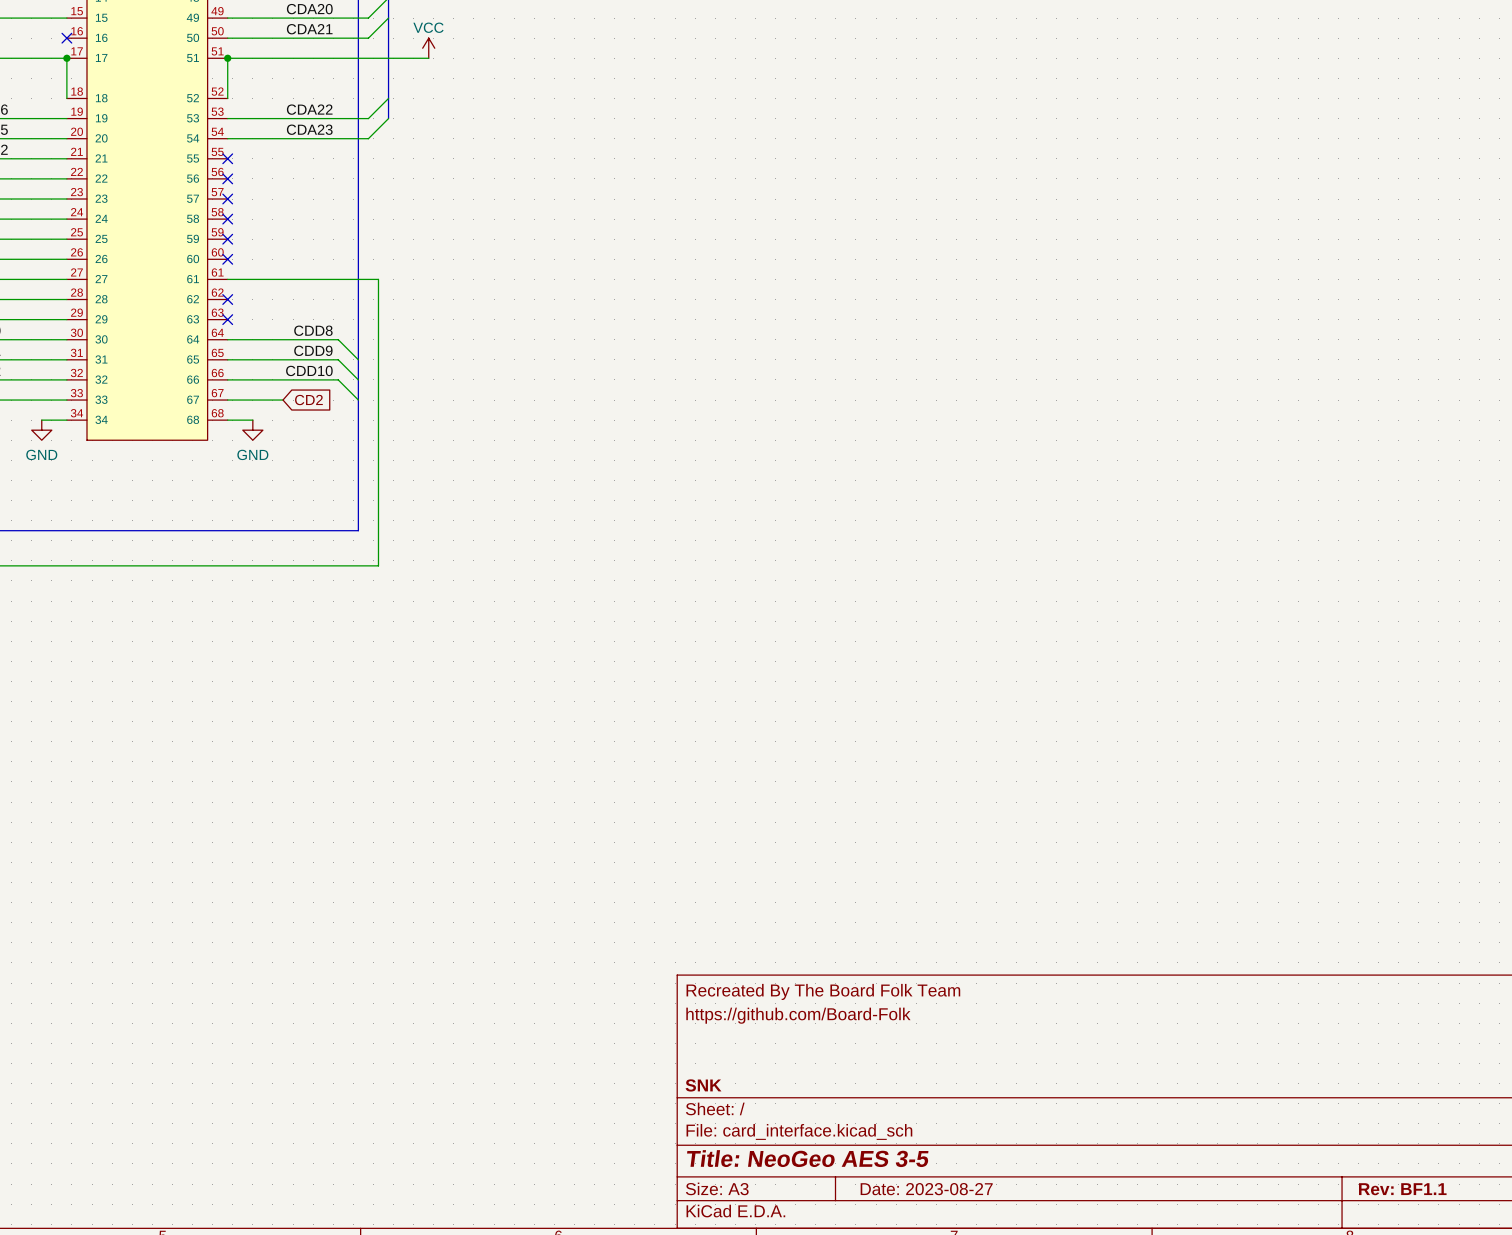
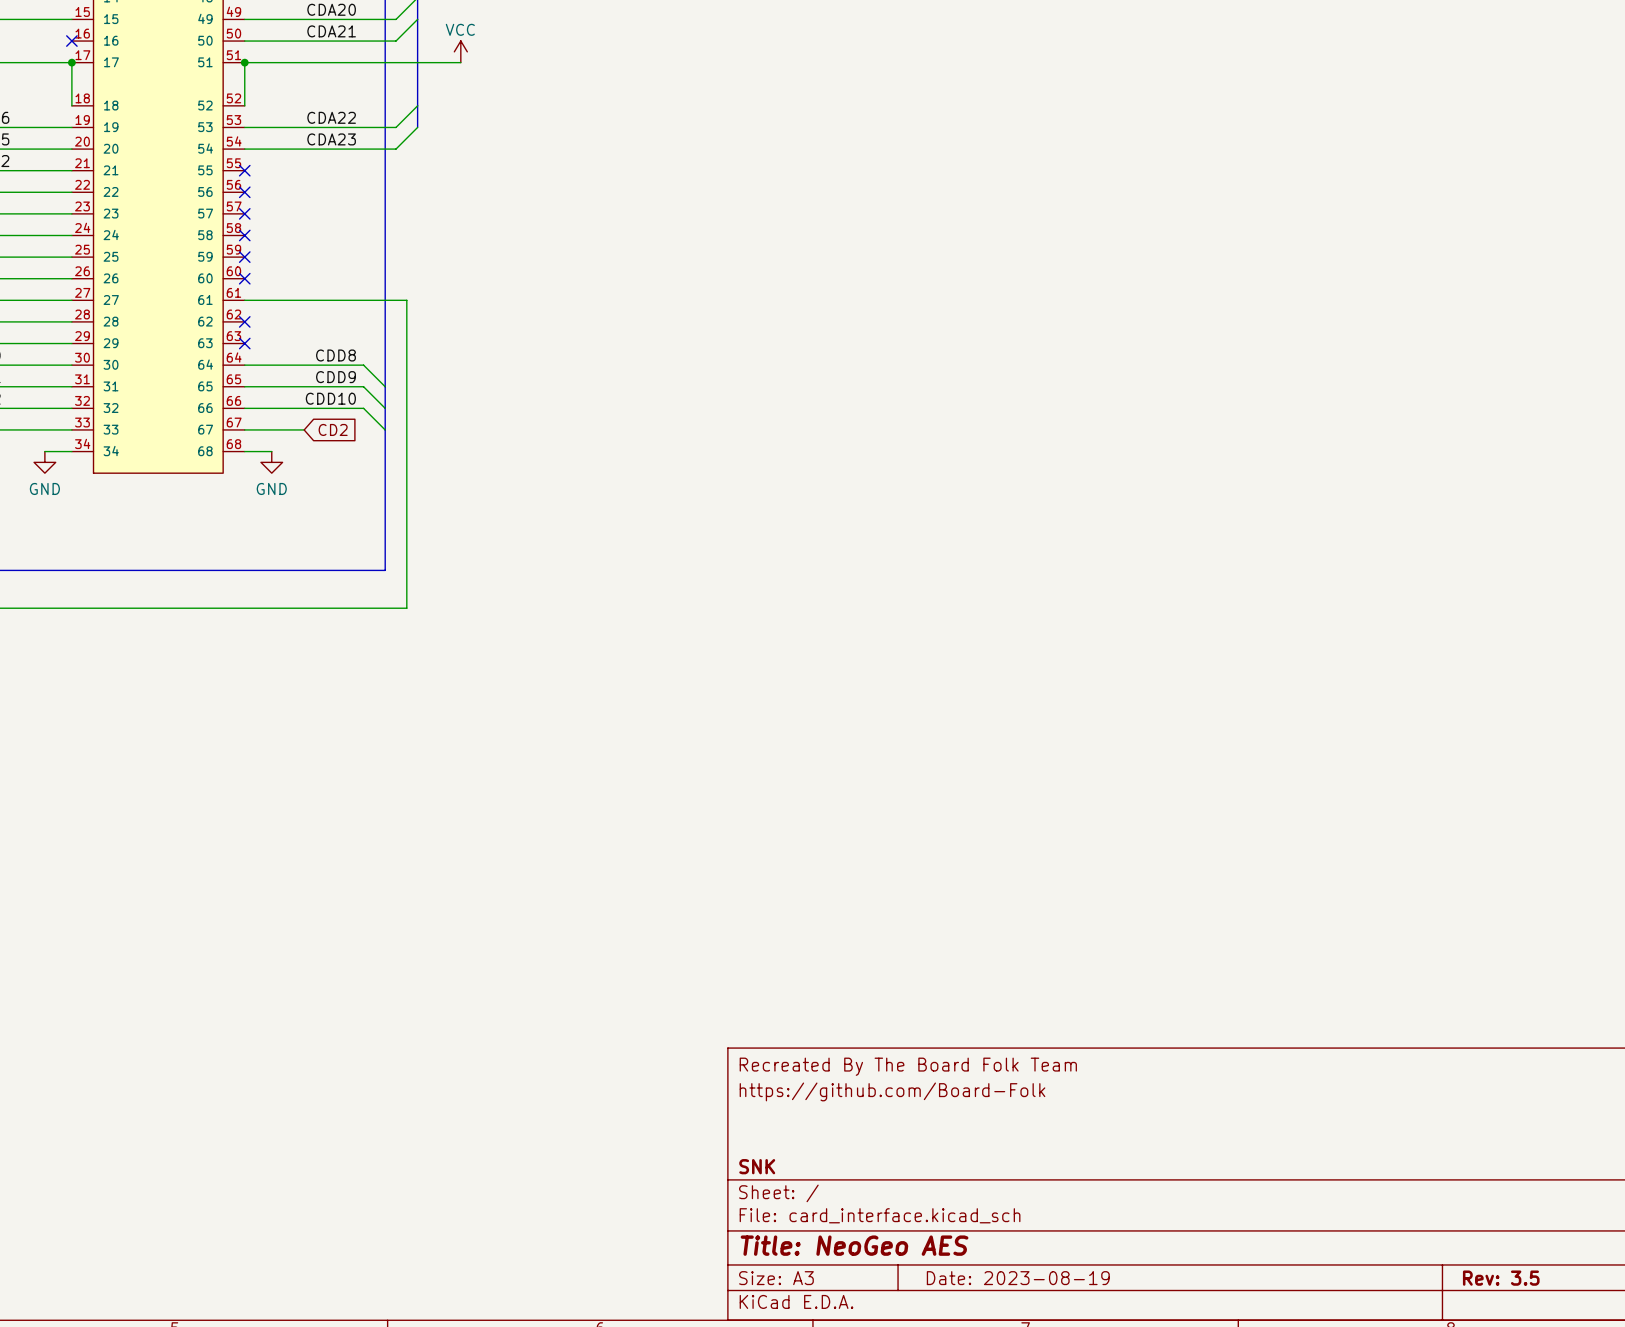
title block: Title: NeoGeo AES 3-5 (807, 1158) -> Title: NeoGeo AES (854, 1245)
title block: Date: 2023-08-27 (926, 1189) -> Date: 2023-08-19 (1018, 1278)
title block: Rev: BF1.1 (1402, 1189) -> Rev: 3.5 (1501, 1278)

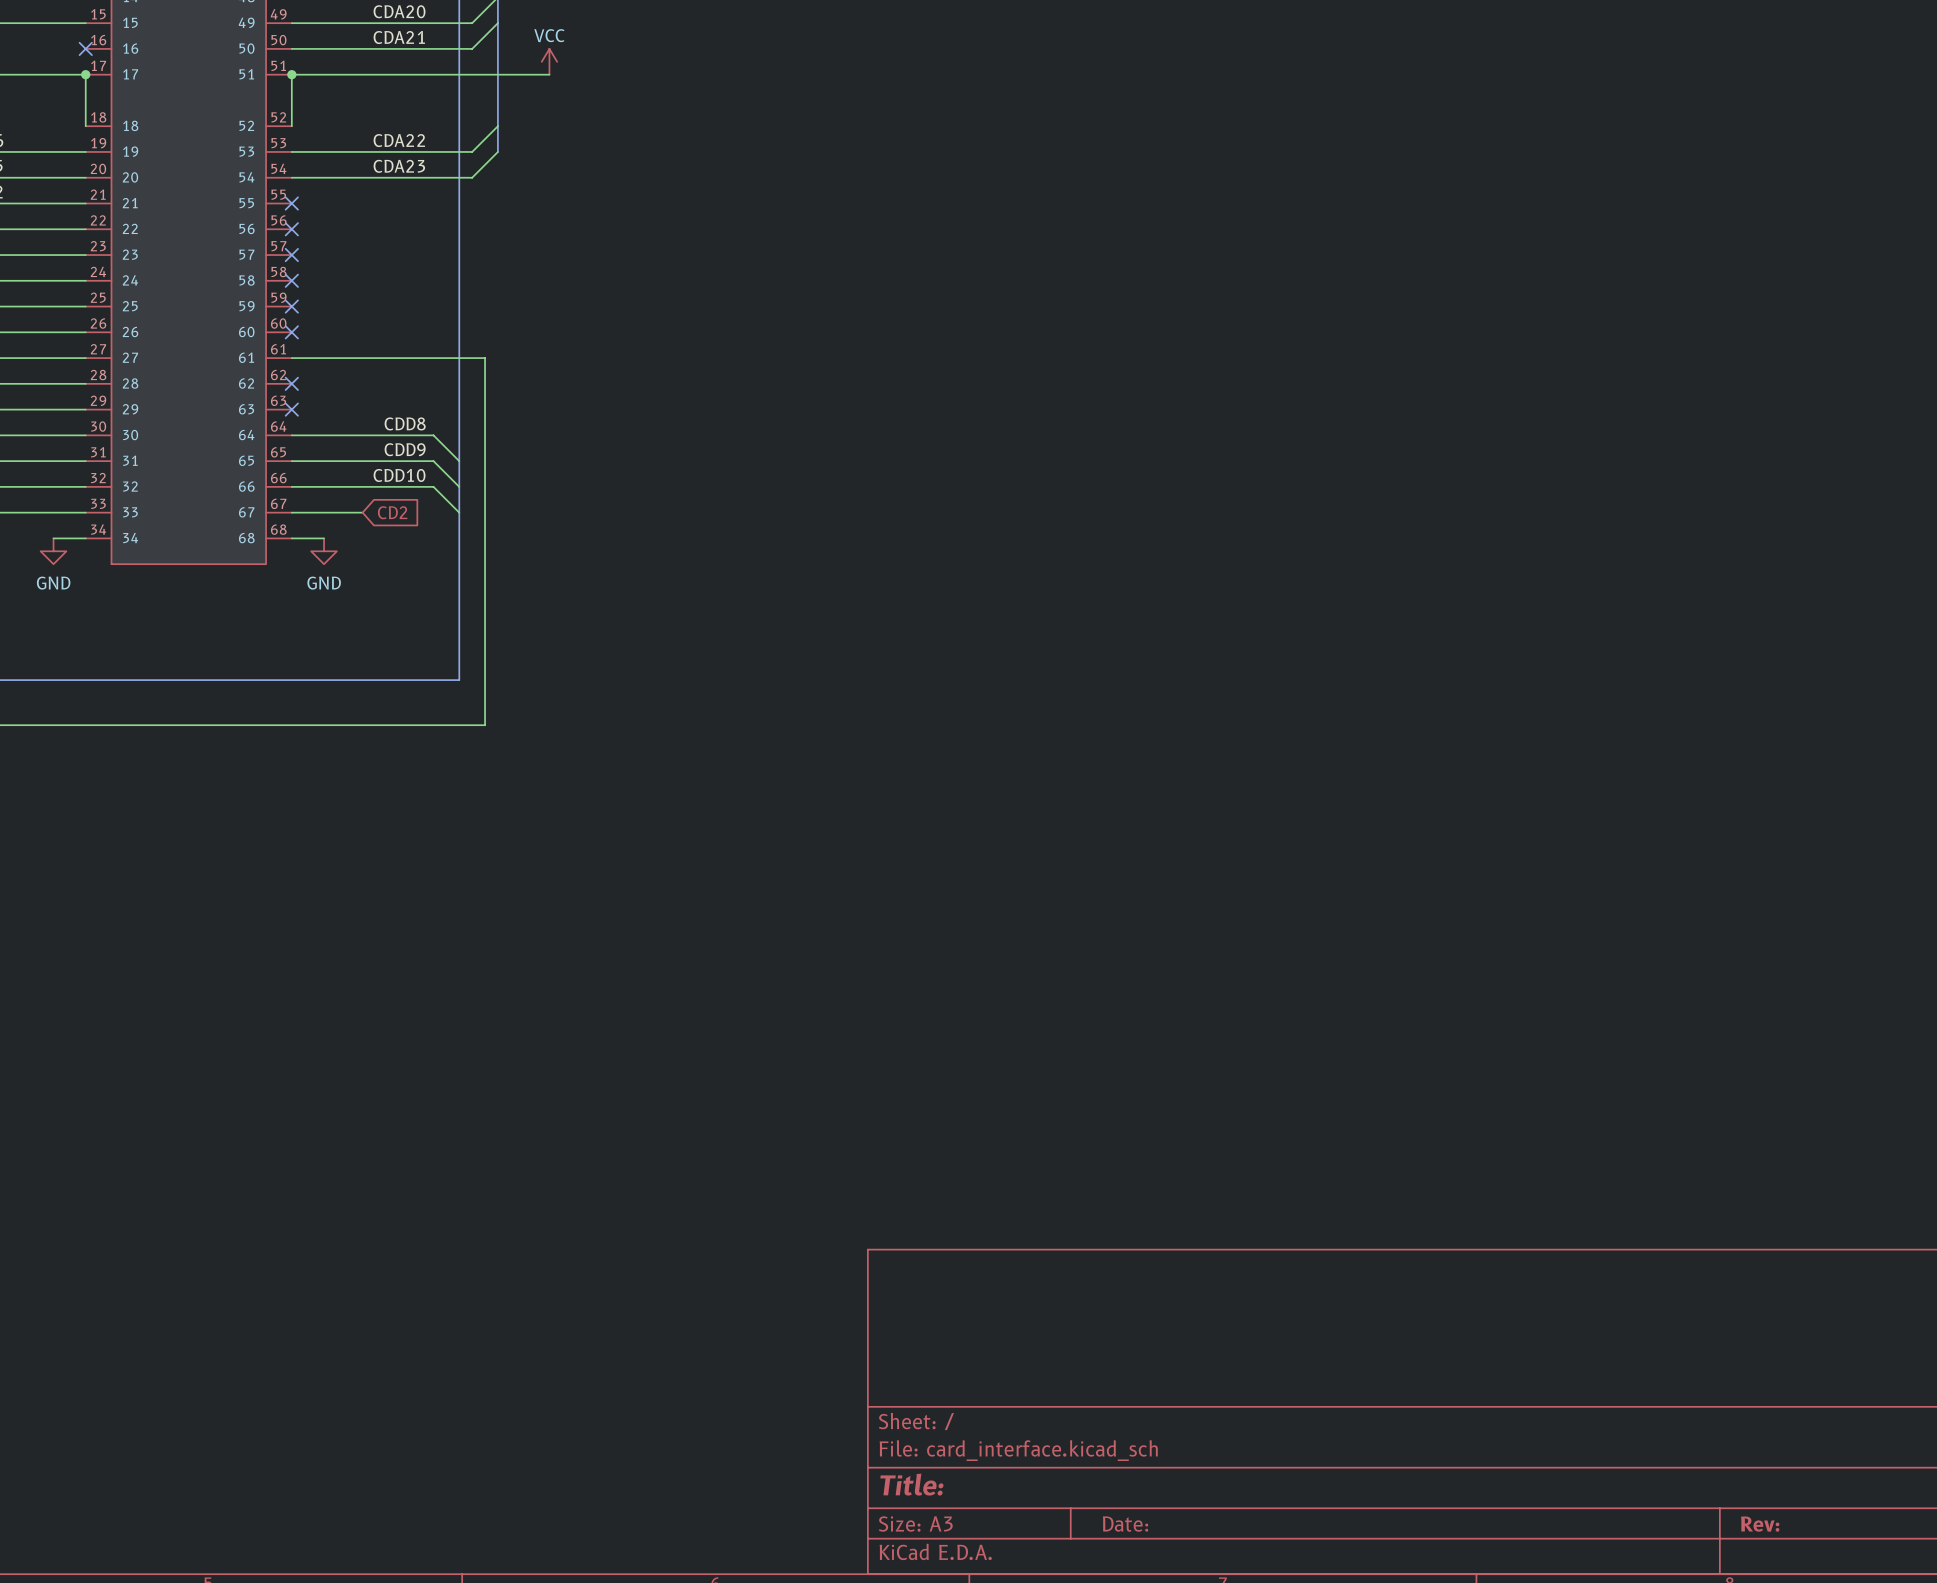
title block: Recreated By The Board Folk Team (908, 1066) -> none
title block: https://github.com/Board-Folk (892, 1091) -> none
title block: SNK (757, 1166) -> none
title block: Title: NeoGeo AES (854, 1245) -> Title: (911, 1484)
title block: Date: 2023-08-19 (1018, 1278) -> Date: (1125, 1524)
title block: Rev: 3.5 (1501, 1278) -> Rev: (1760, 1524)

